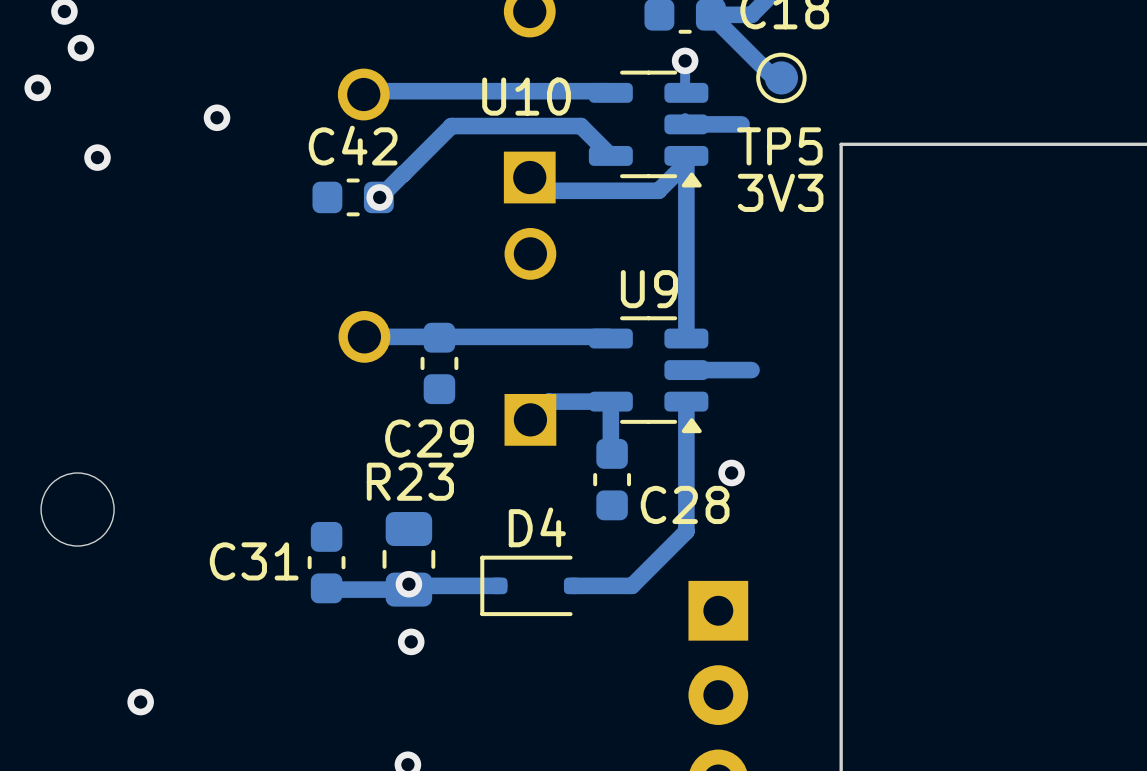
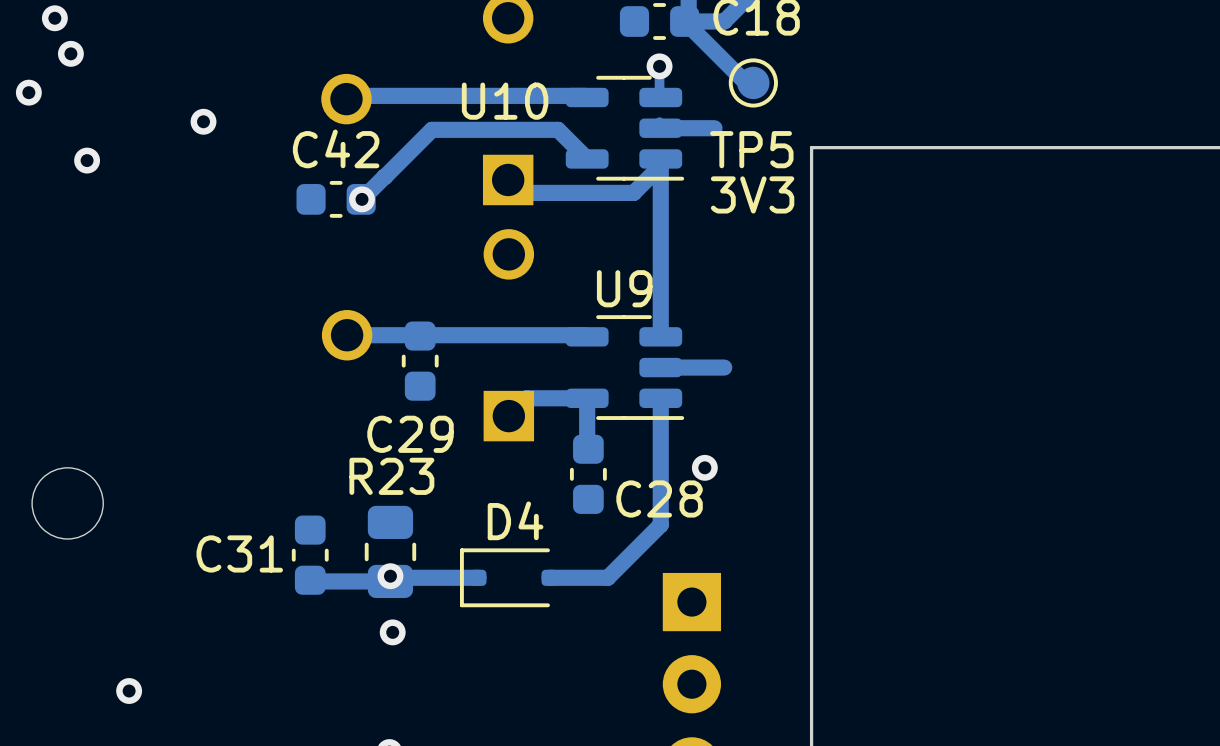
U10 footprint: [588, 70, 709, 188] -> [565, 75, 685, 181]
U9 footprint: [588, 316, 709, 434] -> [565, 315, 685, 420]

